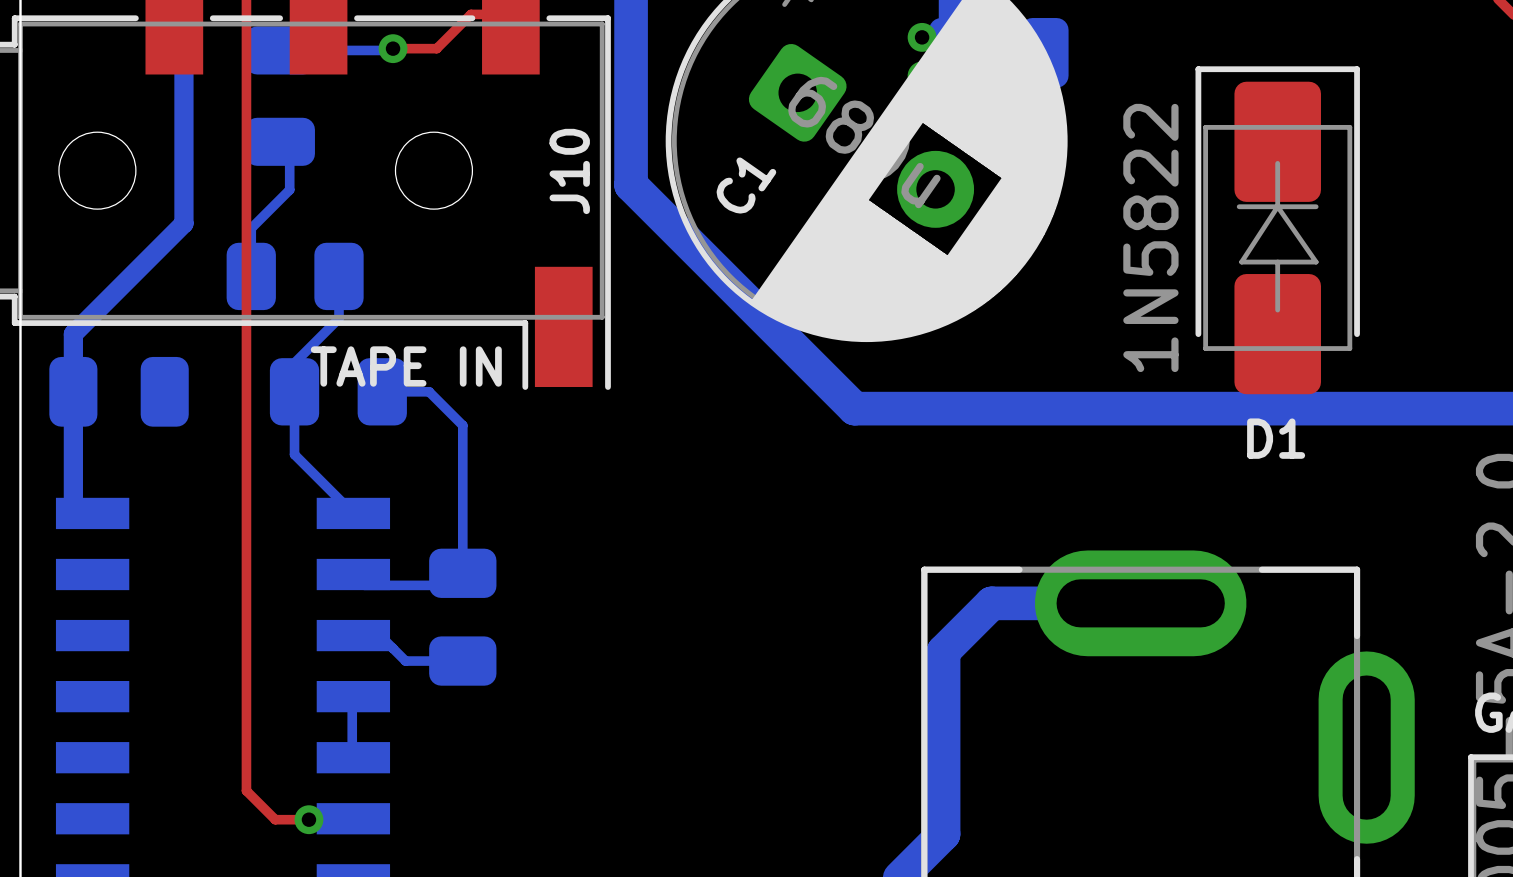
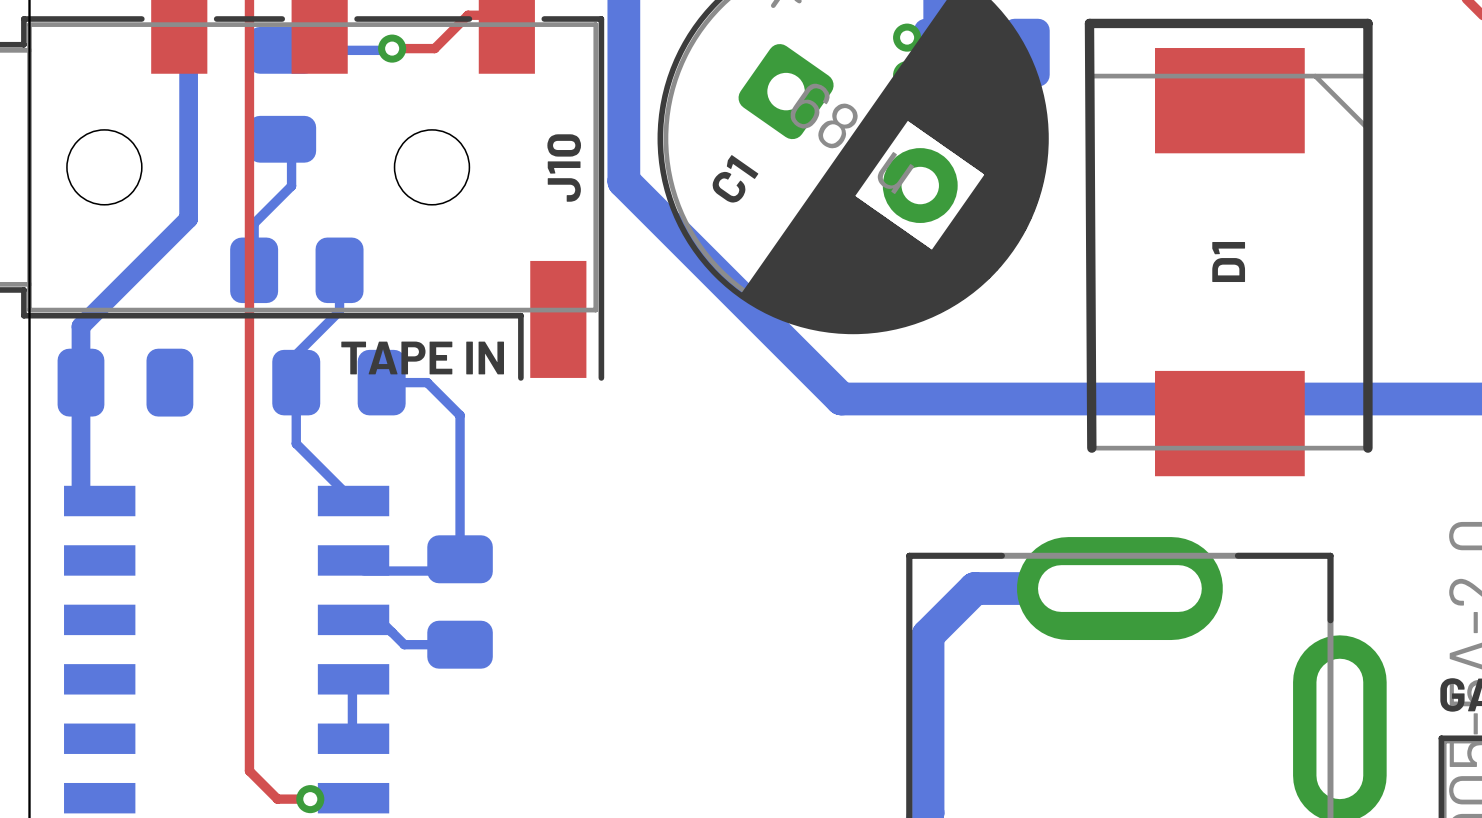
D1 footprint: [1195, 66, 1360, 395] -> [1084, 18, 1373, 477]
D1 value: 1N5822 (1150, 237) -> none
D1 name position: D1 (1276, 438) -> D1 (1228, 262)

